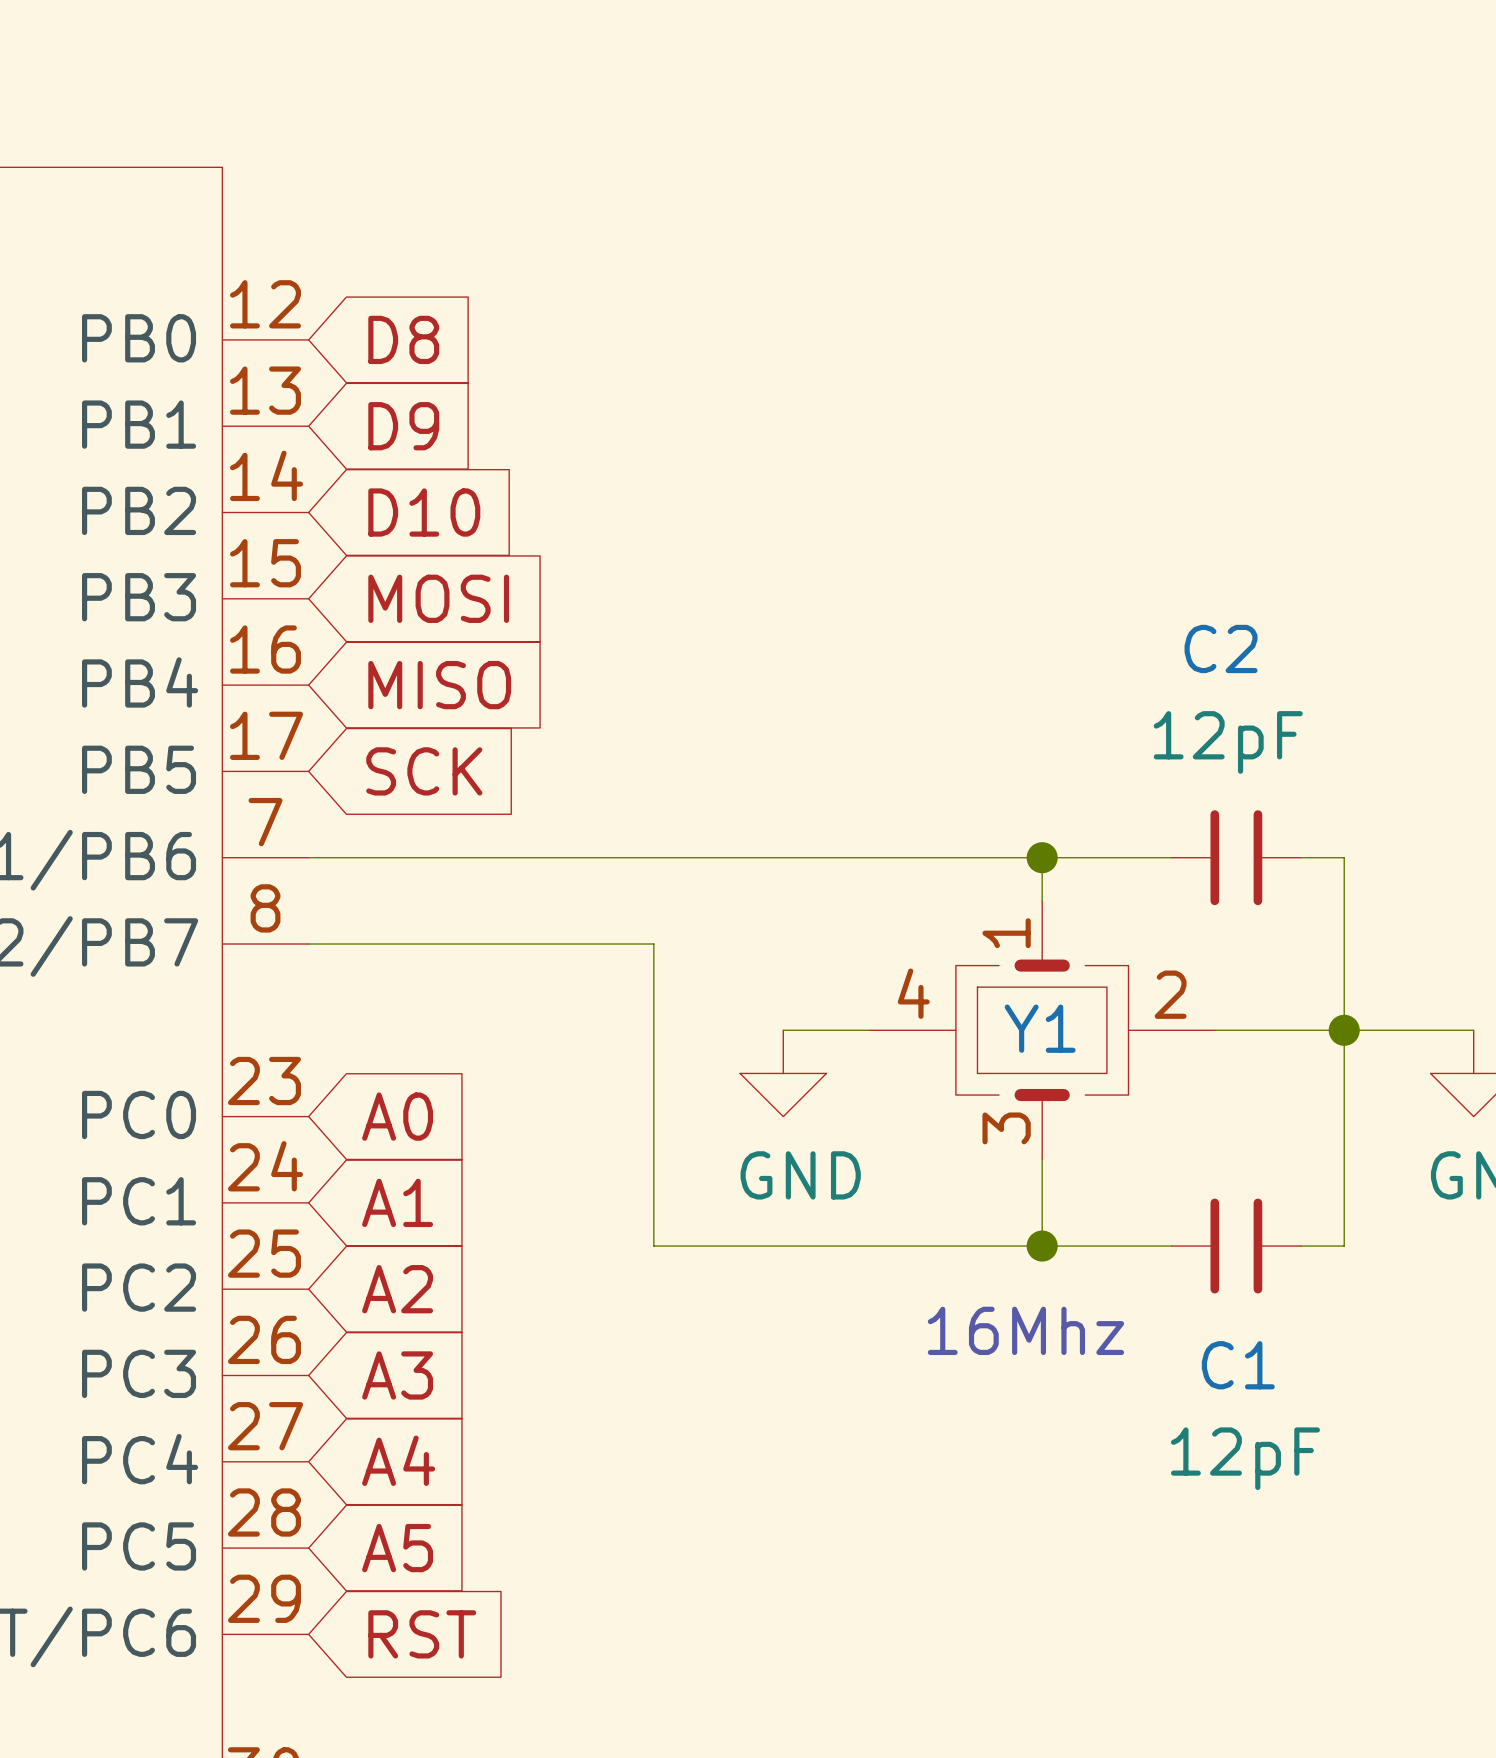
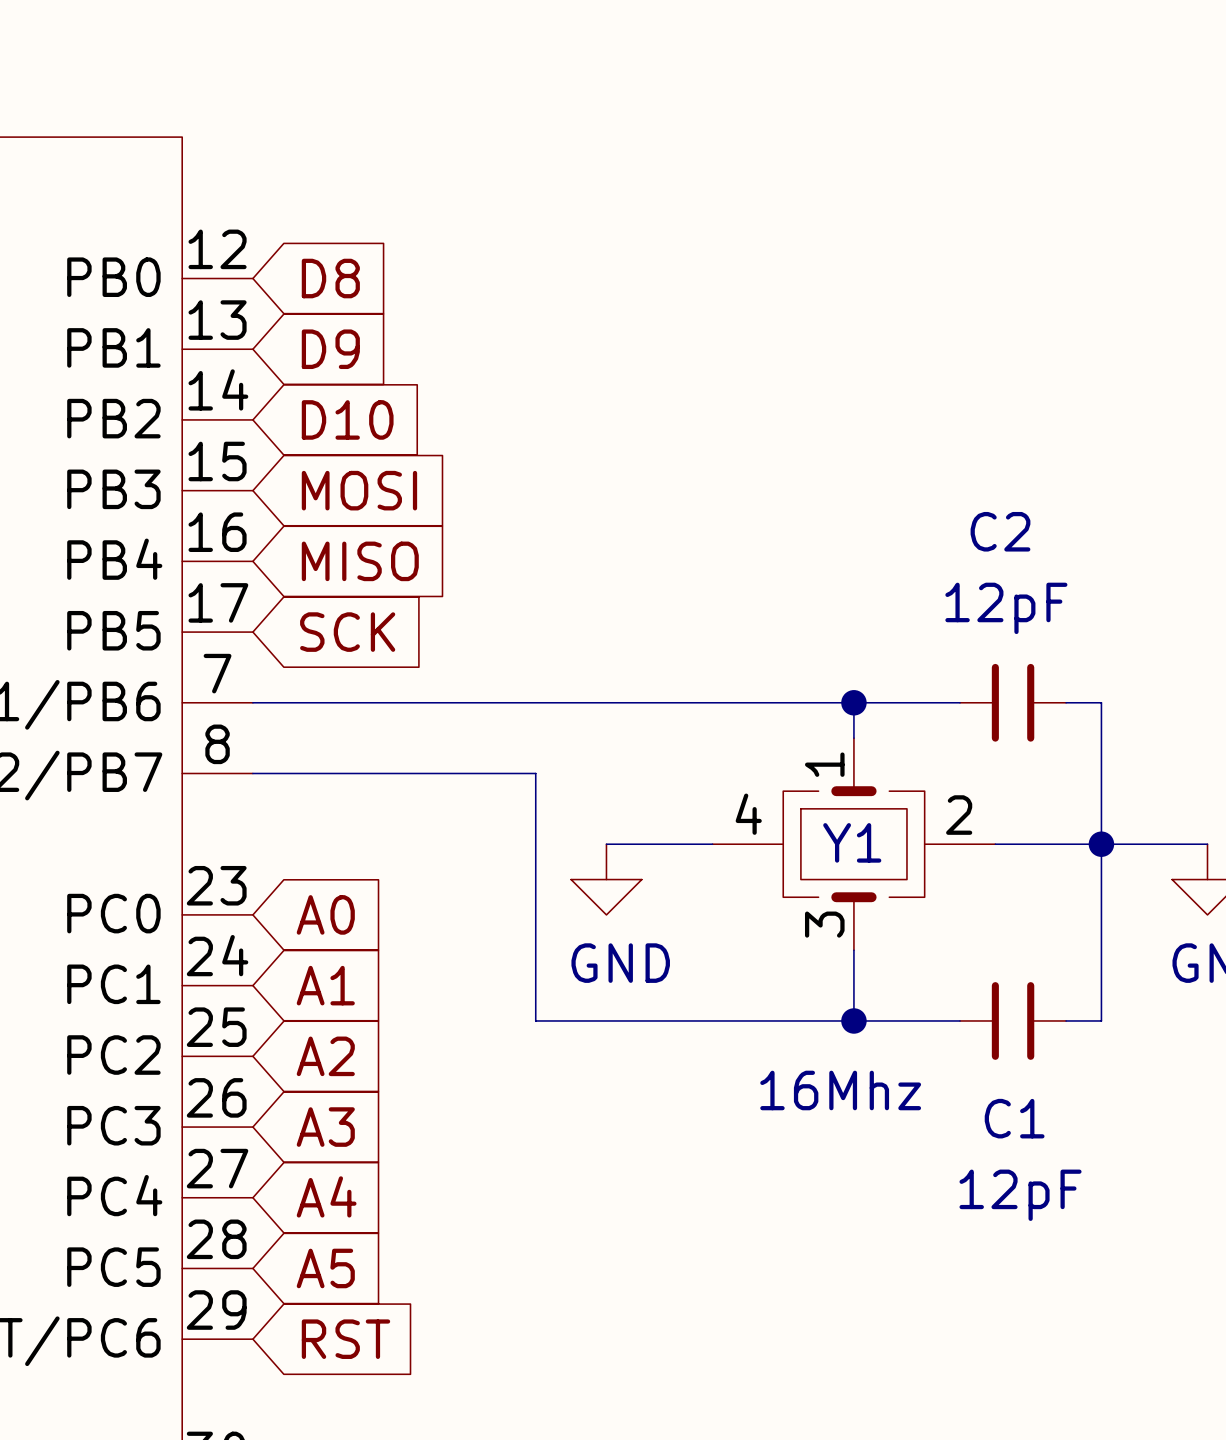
wire: none -> (606, 844) (641, 844)
power symbol position: GND (783, 1073) -> GND (606, 879)

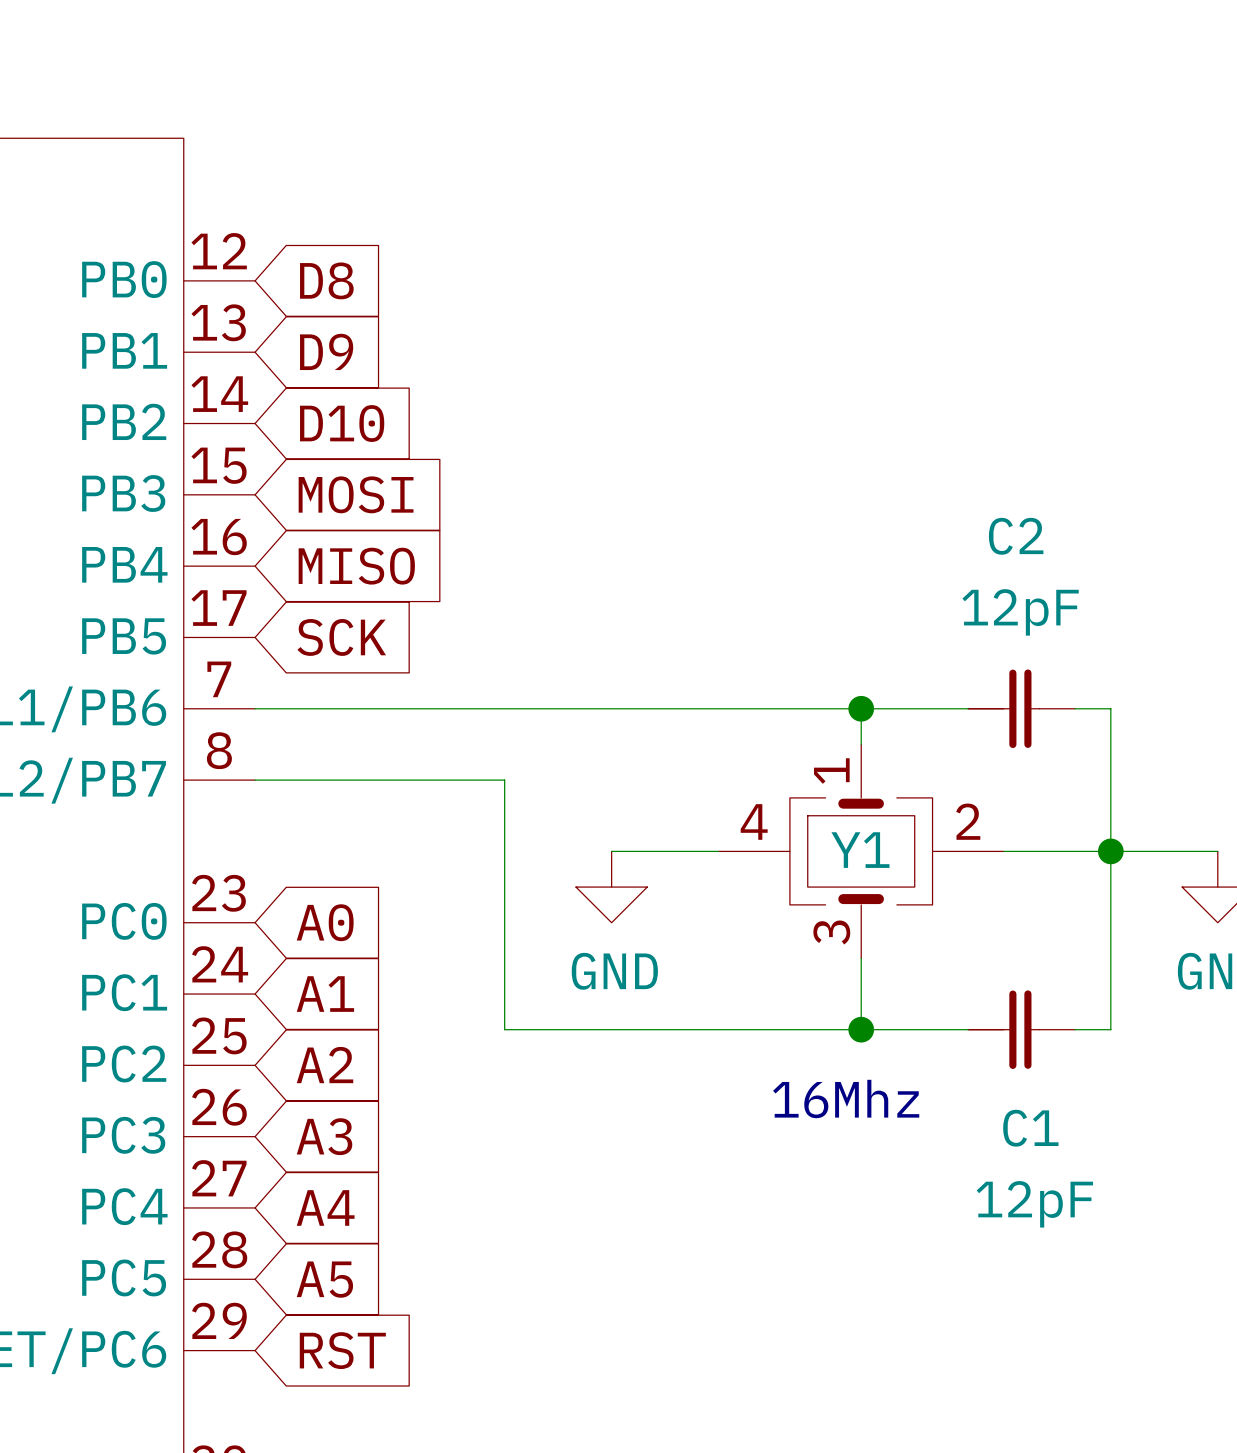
C2 symbol: [960, 663, 1067, 742] -> [968, 669, 1076, 749]
Y1 symbol: [712, 738, 996, 951] -> [718, 744, 1004, 959]
wire: (500, 773) (535, 773) (535, 1020) -> (504, 780) (504, 1029) (540, 1029)
C1 symbol: [960, 982, 1067, 1060] -> [968, 990, 1076, 1069]

